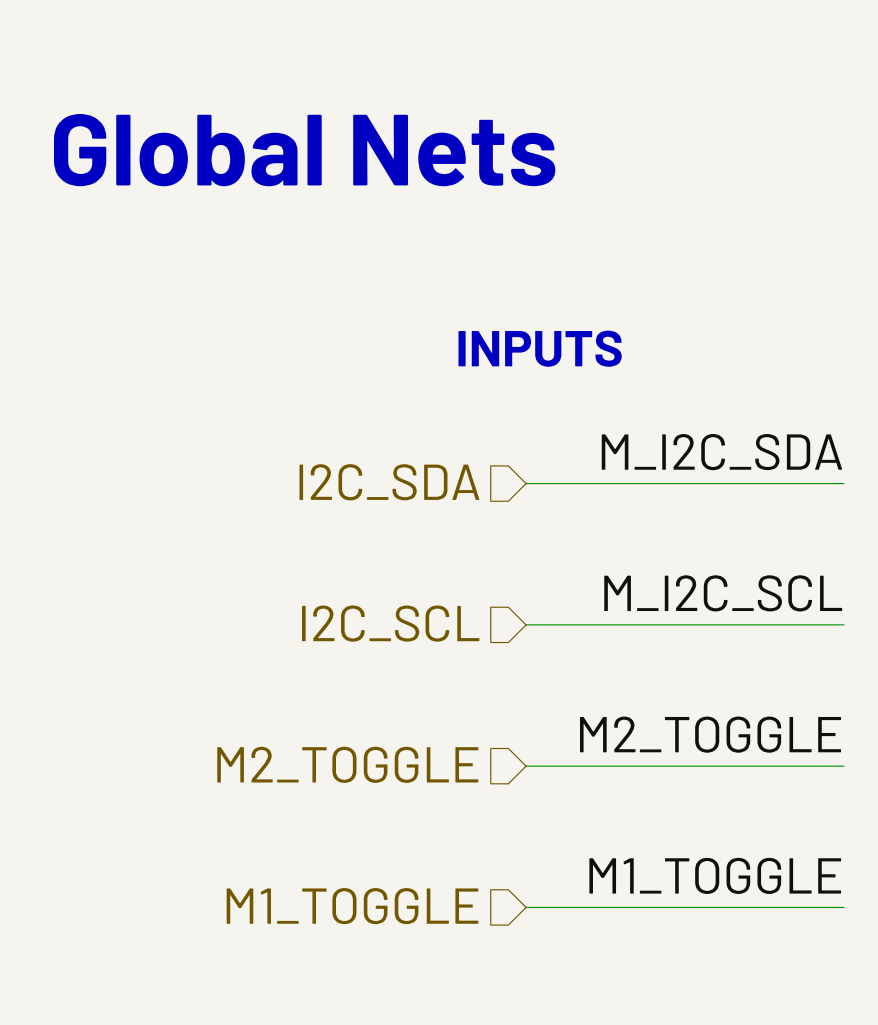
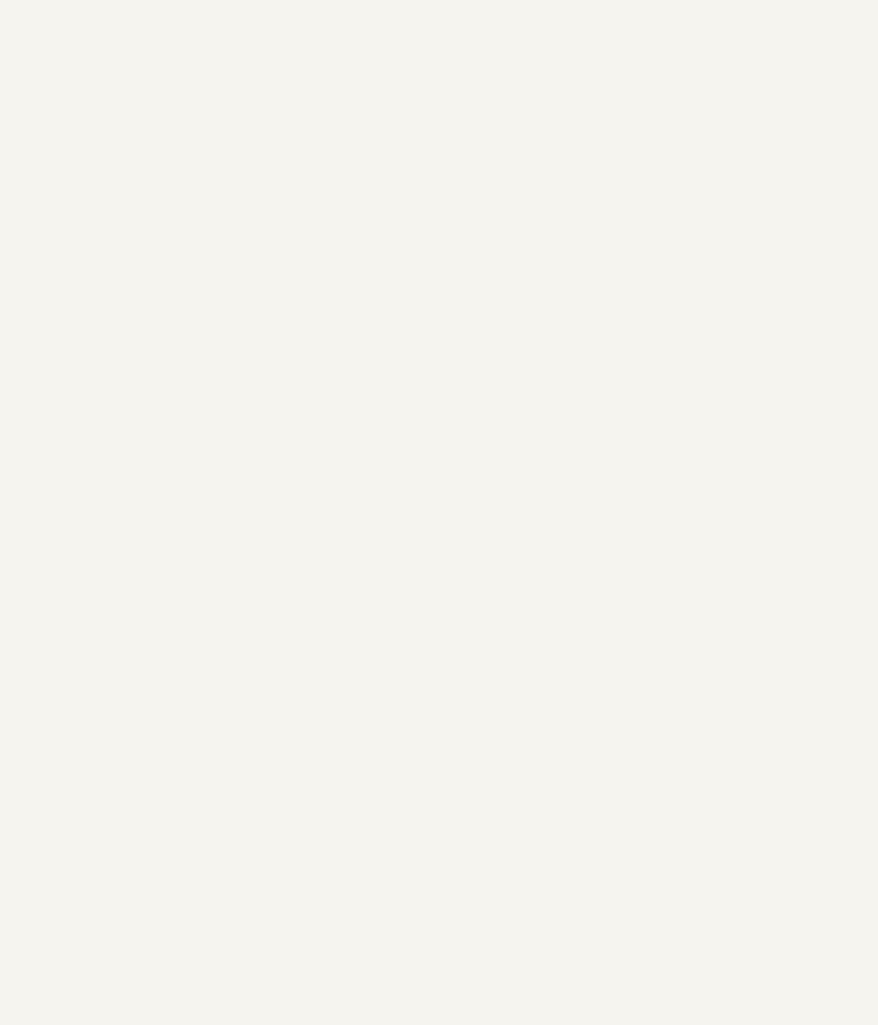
text: Global Nets (304, 150) -> none
text: INPUTS (540, 348) -> none
label: M_I2C_SDA (721, 452) -> none
hierarchical label: I2C_SDA (389, 482) -> none
wire: (526, 483) (843, 483) -> none
label: M_I2C_SCL (723, 593) -> none
hierarchical label: I2C_SCL (390, 623) -> none
wire: (526, 624) (843, 624) -> none
label: M2_TOGGLE (710, 734) -> none
hierarchical label: M2_TOGGLE (347, 764) -> none
wire: (526, 766) (843, 766) -> none
label: M1_TOGGLE (715, 875) -> none
hierarchical label: M1_TOGGLE (352, 906) -> none
wire: (526, 907) (843, 907) -> none

